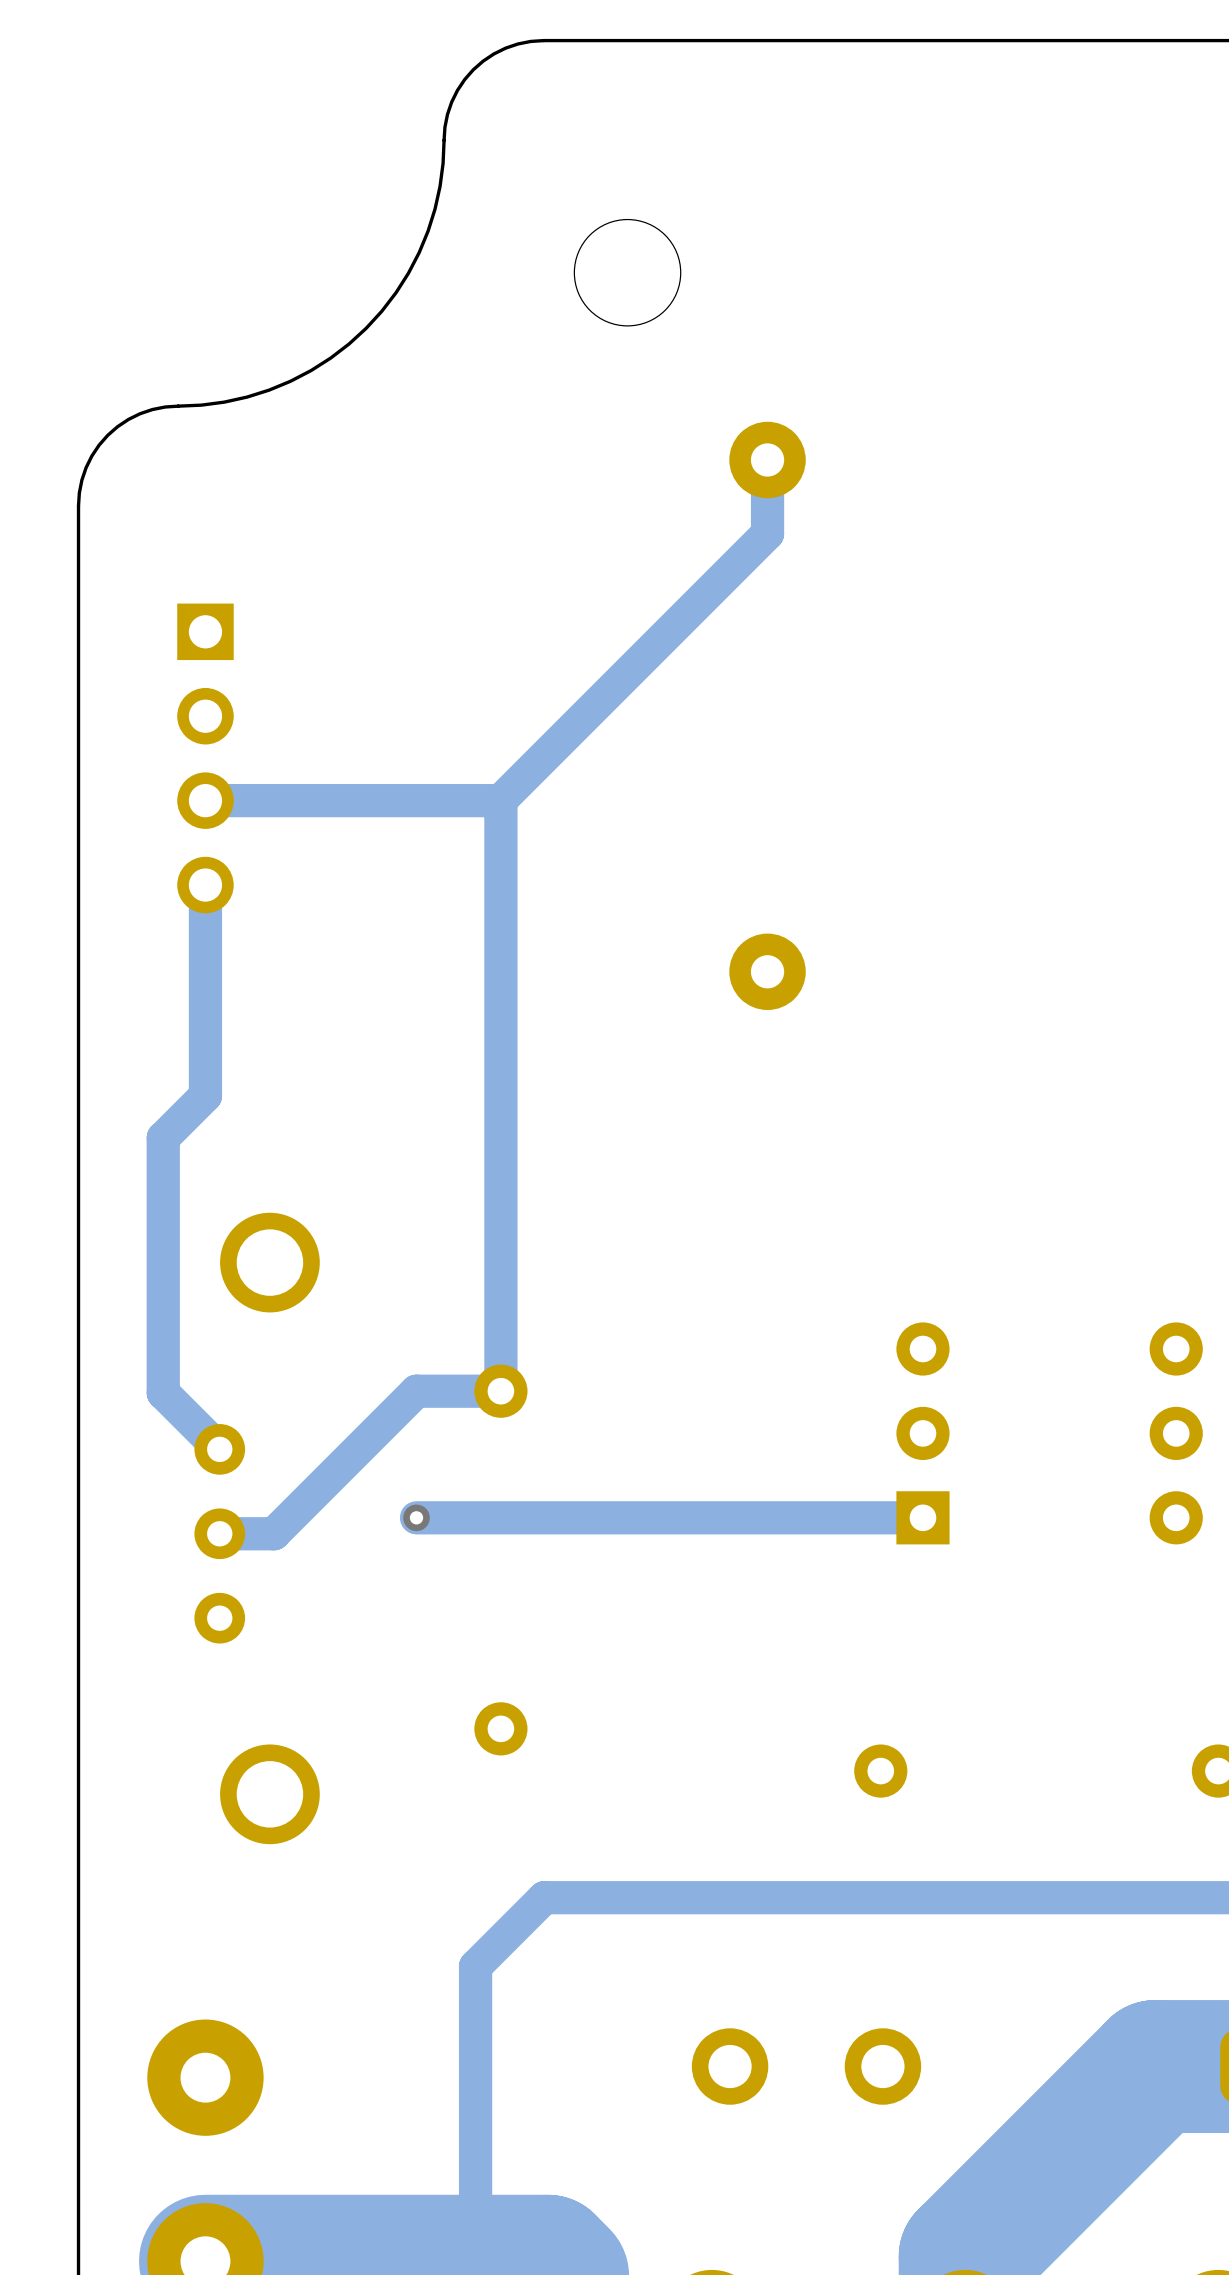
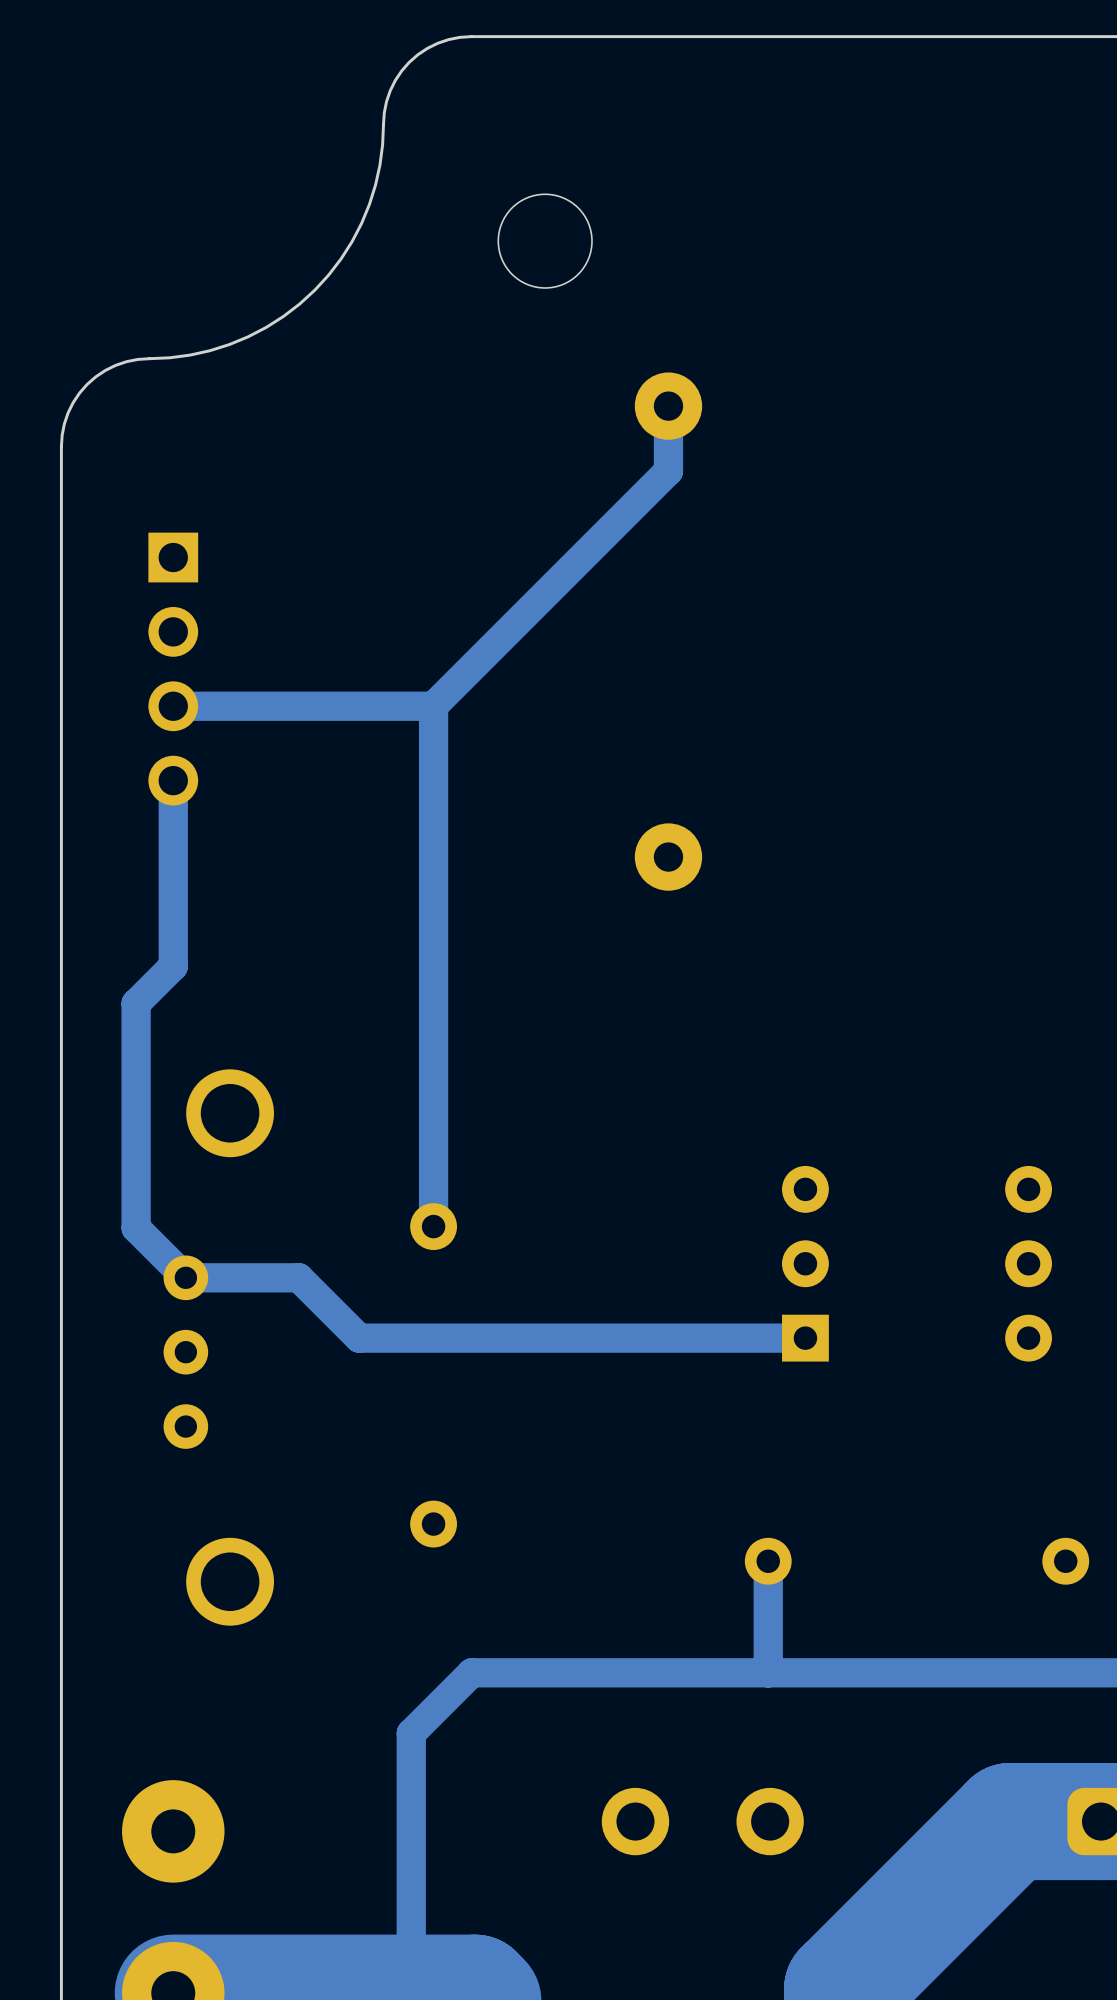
track: (500, 1391) (416, 1391) (273, 1533) (219, 1533) -> none
track: none -> (185, 1277) (298, 1277) (359, 1338)
via: (416, 1517) -> none
track: none -> (768, 1561) (768, 1672)

